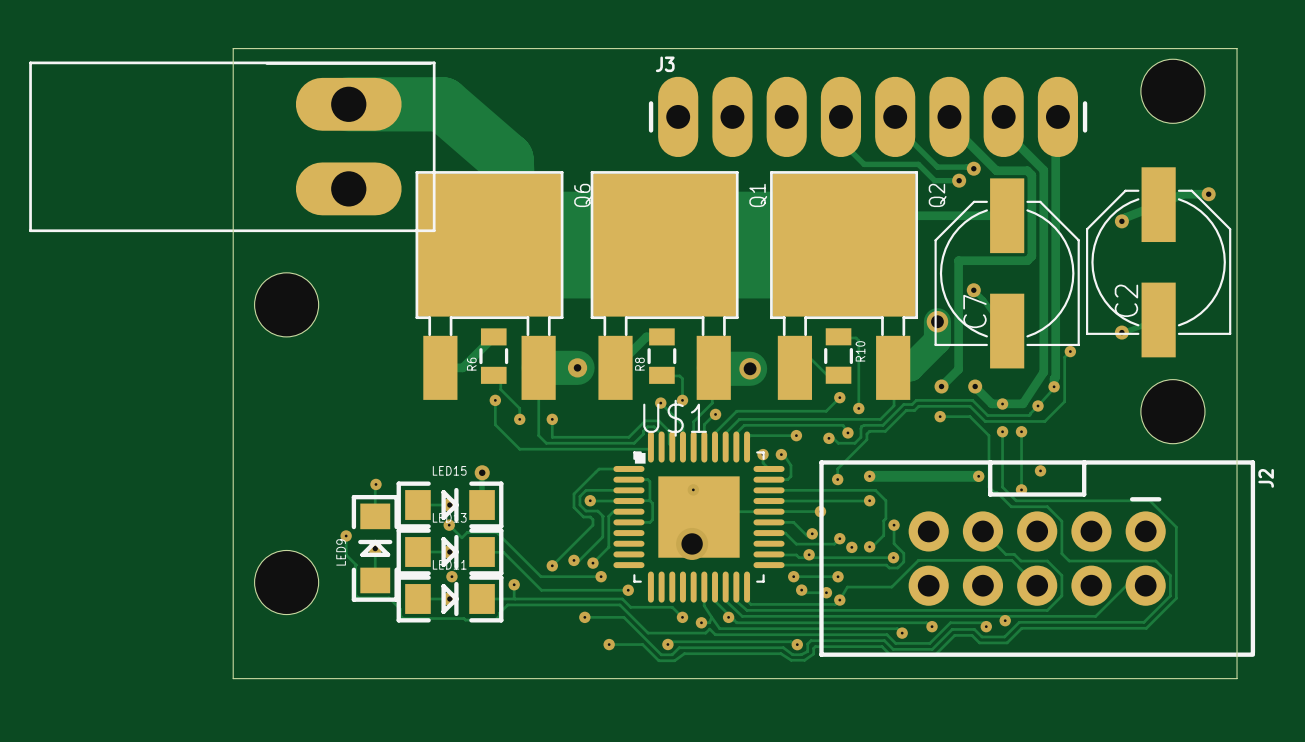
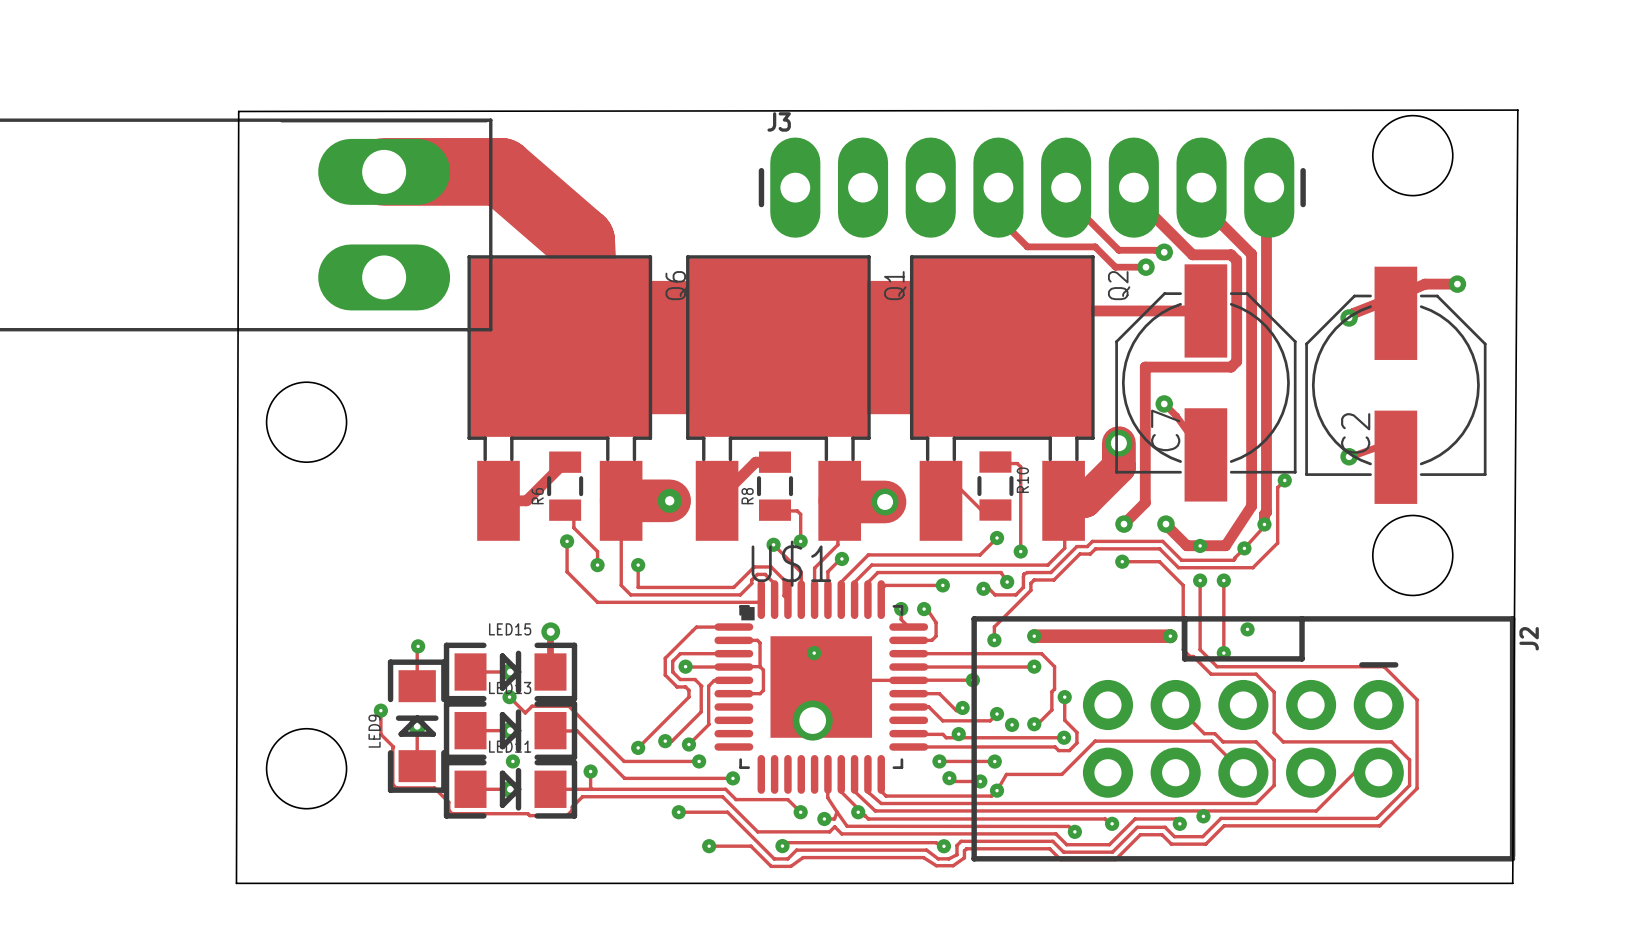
board edge: (233, 48) (1237, 48) (1237, 678) (233, 678) (233, 48) -> (1517, 110) (238, 111) (236, 883) (1512, 883) (1517, 110)
C2 position: (1158, 262) -> (1395, 385)

